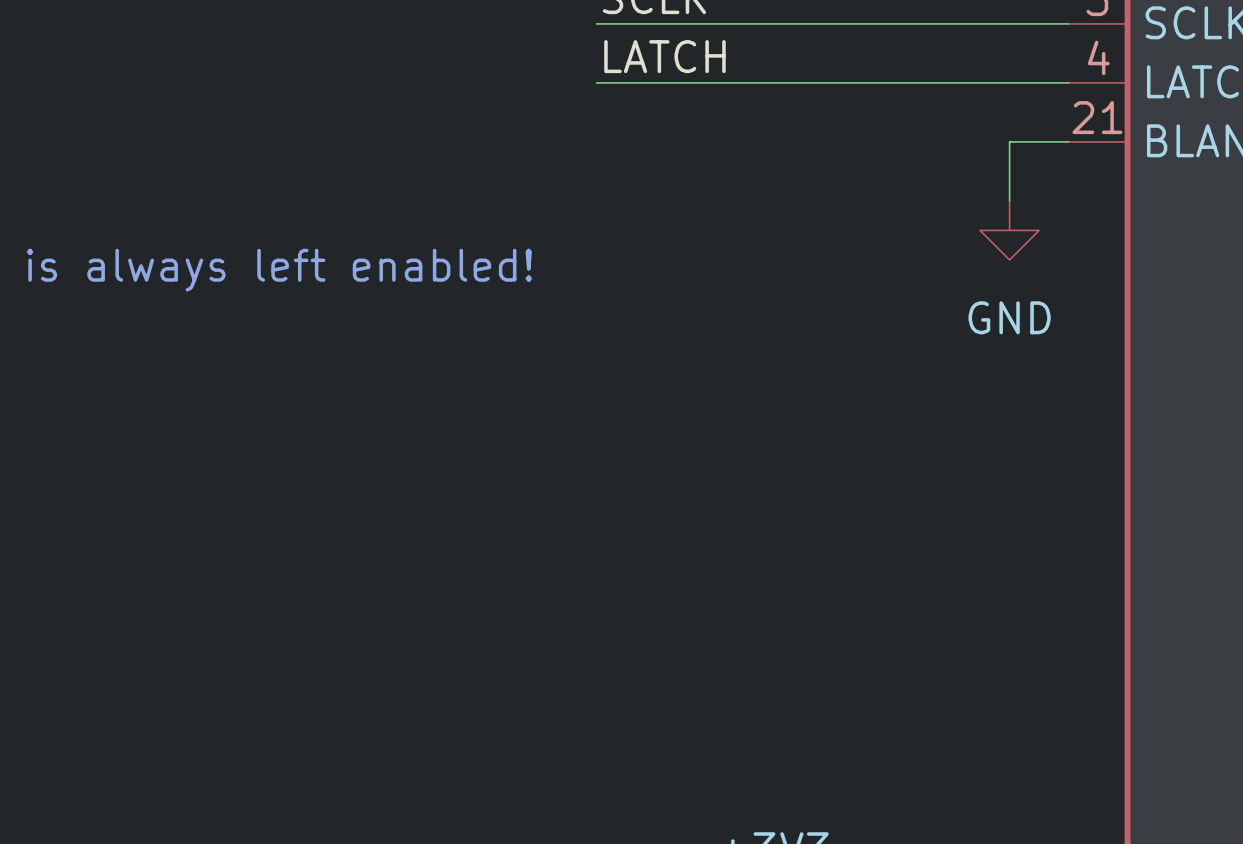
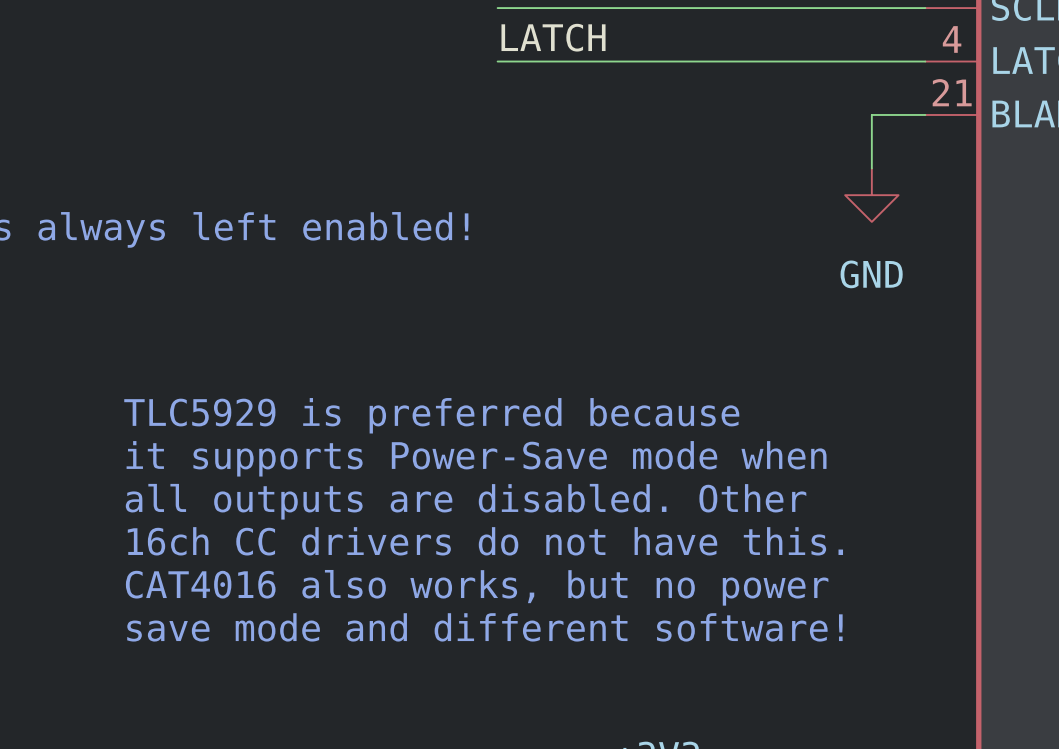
text: none -> TLC5929 is preferred because (431, 415)
text: none -> it supports Power-Save mode when (476, 458)
text: none -> all outputs are disabled. Other (466, 501)
text: none -> 16ch CC drivers do not have this. (485, 541)
text: none -> CAT4016 also works, but no power (477, 587)
text: none -> save mode and different software! (484, 627)

